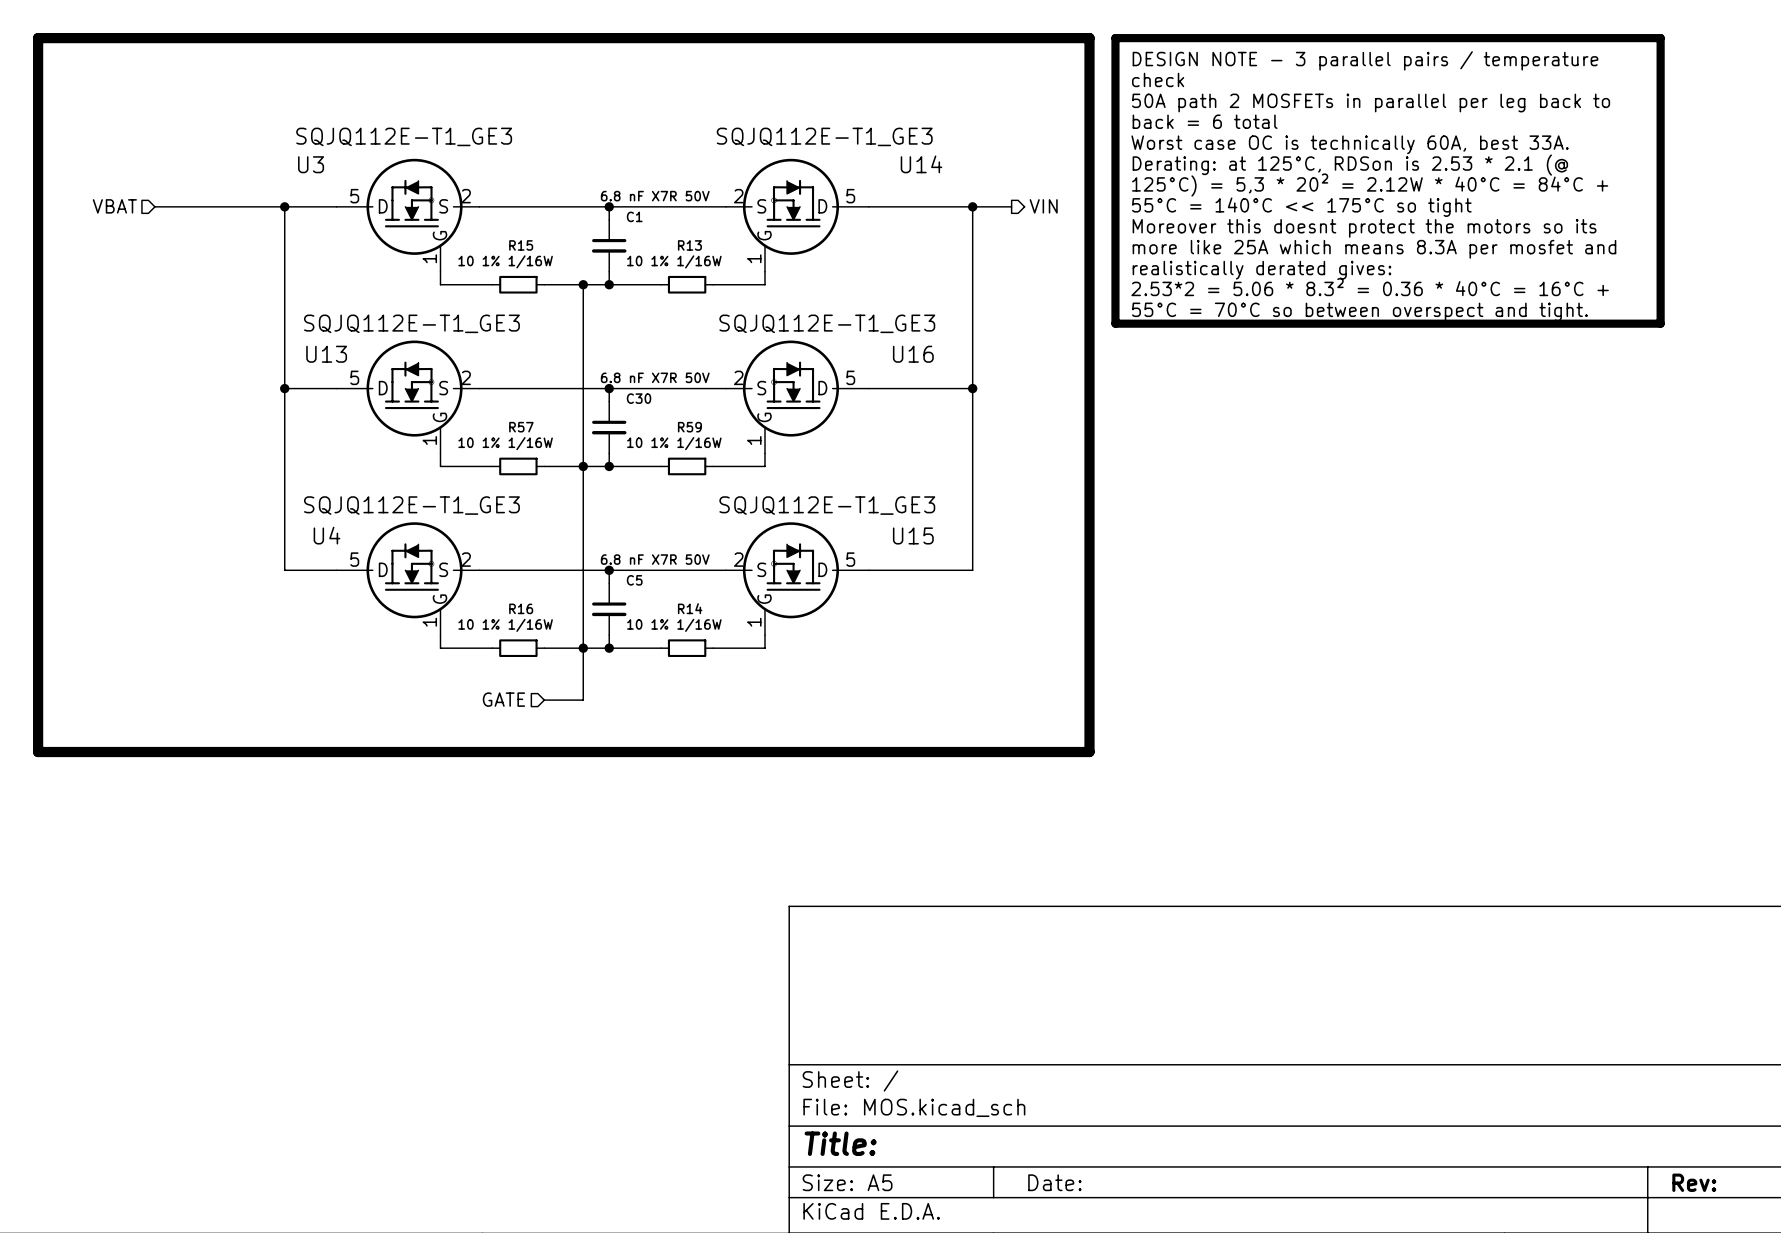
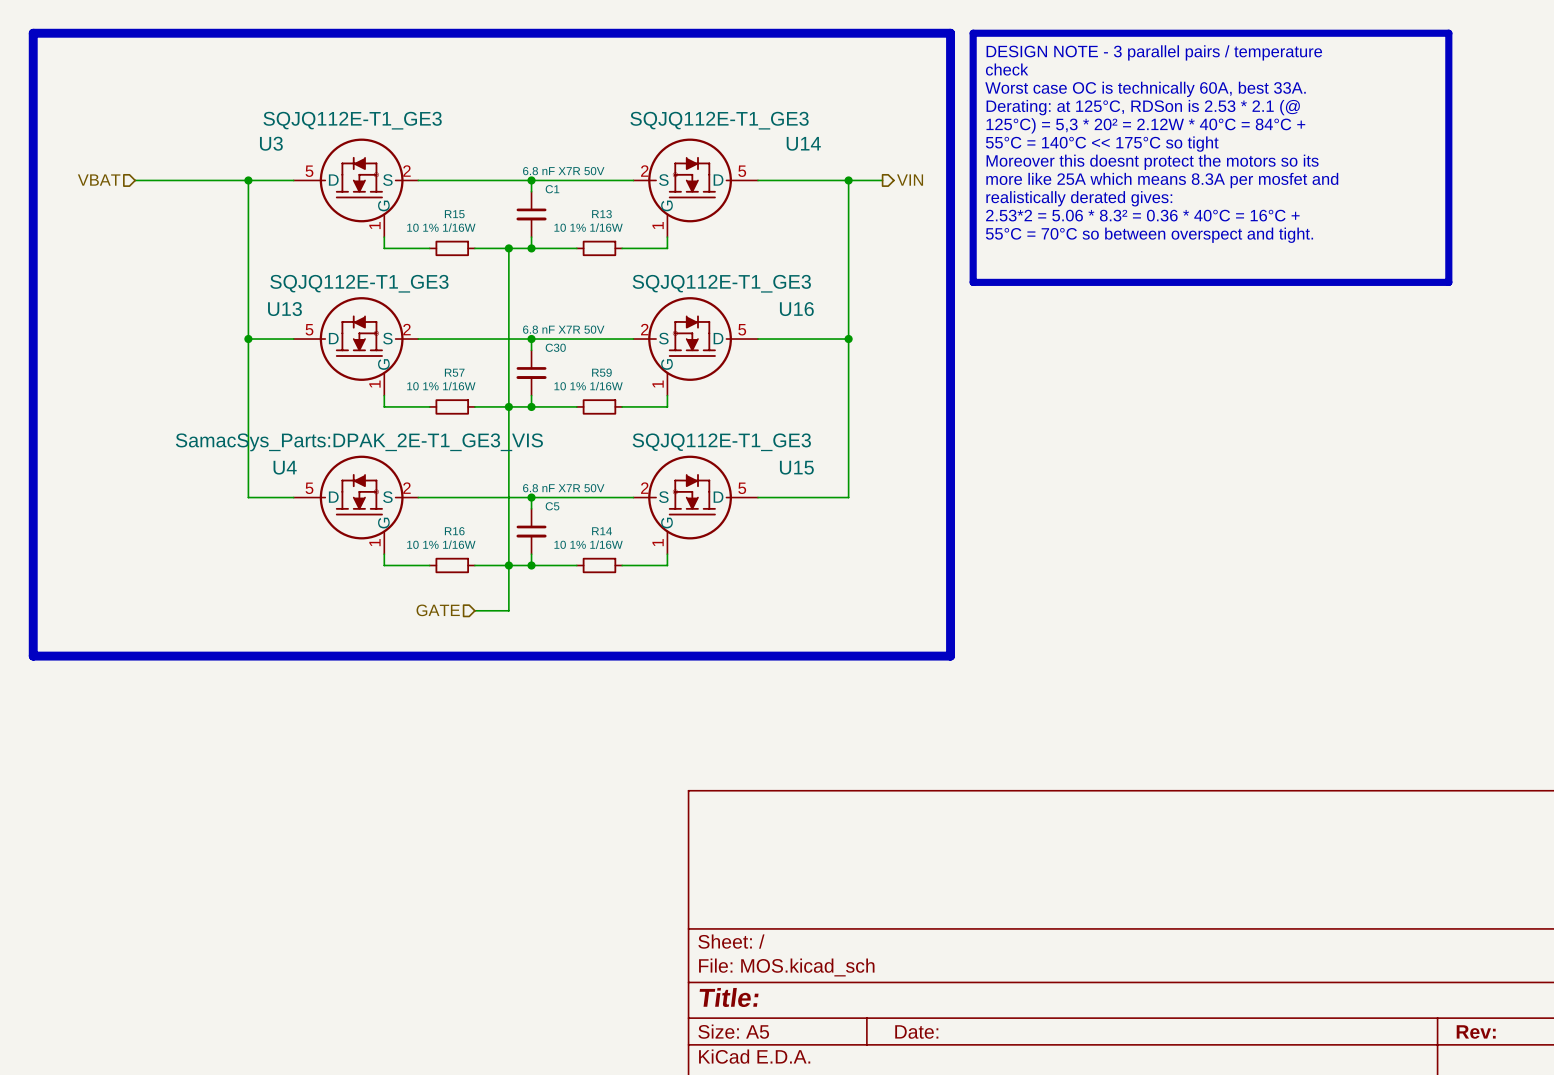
text: 50A path 2 MOSFETs in parallel per leg back to (1371, 103) -> Worst case OC is technically 60A, best 33A. (1145, 89)
text: back = 6 total (1205, 121) -> Derating: at 125°C, RDSon is 2.53 * 2.1 (@ (1143, 107)
text: Worst case OC is technically 60A, best 33A. (1350, 144) -> 125°C) = 5,3 * 20² = 2.12W * 40°C = 84°C + (1145, 125)
text: Derating: at 125°C, RDSon is 2.53 * 2.1 (@ (1350, 165) -> 55°C = 140°C << 175°C so tight (1102, 144)
text: 125°C) = 5,3 * 20² = 2.12W * 40°C = 84°C + (1370, 185) -> Moreover this doesnt protect the motors so its (1152, 162)
text: 55°C = 140°C << 175°C so tight (1301, 207) -> more like 25A which means 8.3A per mosfet and (1162, 180)
text: Moreover this doesnt protect the motors so its (1364, 228) -> realistically derated gives: (1079, 198)
text: more like 25A which means 8.3A per mosfet and (1374, 249) -> 2.53*2 = 5.06 * 8.3² = 0.36 * 40°C = 16°C + (1142, 215)
text: realistically derated gives: (1261, 270) -> 55°C = 70°C so between overspect and tight. (1149, 235)
text: 2.53*2 = 5.06 * 8.3² = 0.36 * 40°C = 16°C + (1370, 287) -> none
text: 55°C = 70°C so between overspect and tight. (1359, 311) -> none
U4 value: SQJQ112E-T1_GE3 (411, 505) -> SamacSys_Parts:DPAK_2E-T1_GE3_VIS (359, 442)

